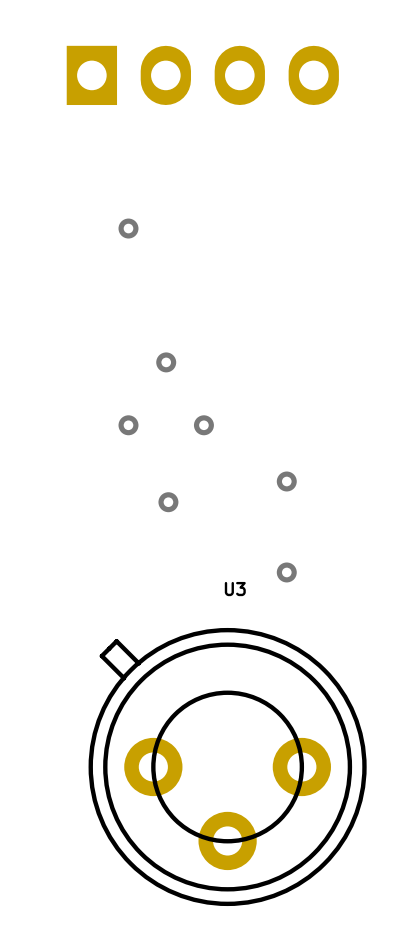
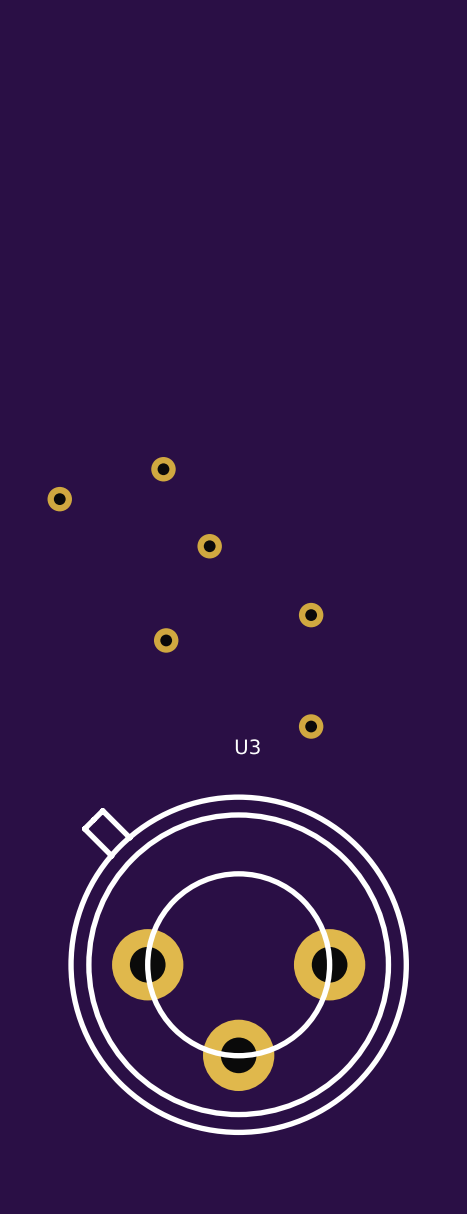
part: (202, 75) -> none
via: (128, 228) -> none
via position: (128, 425) -> (59, 499)

